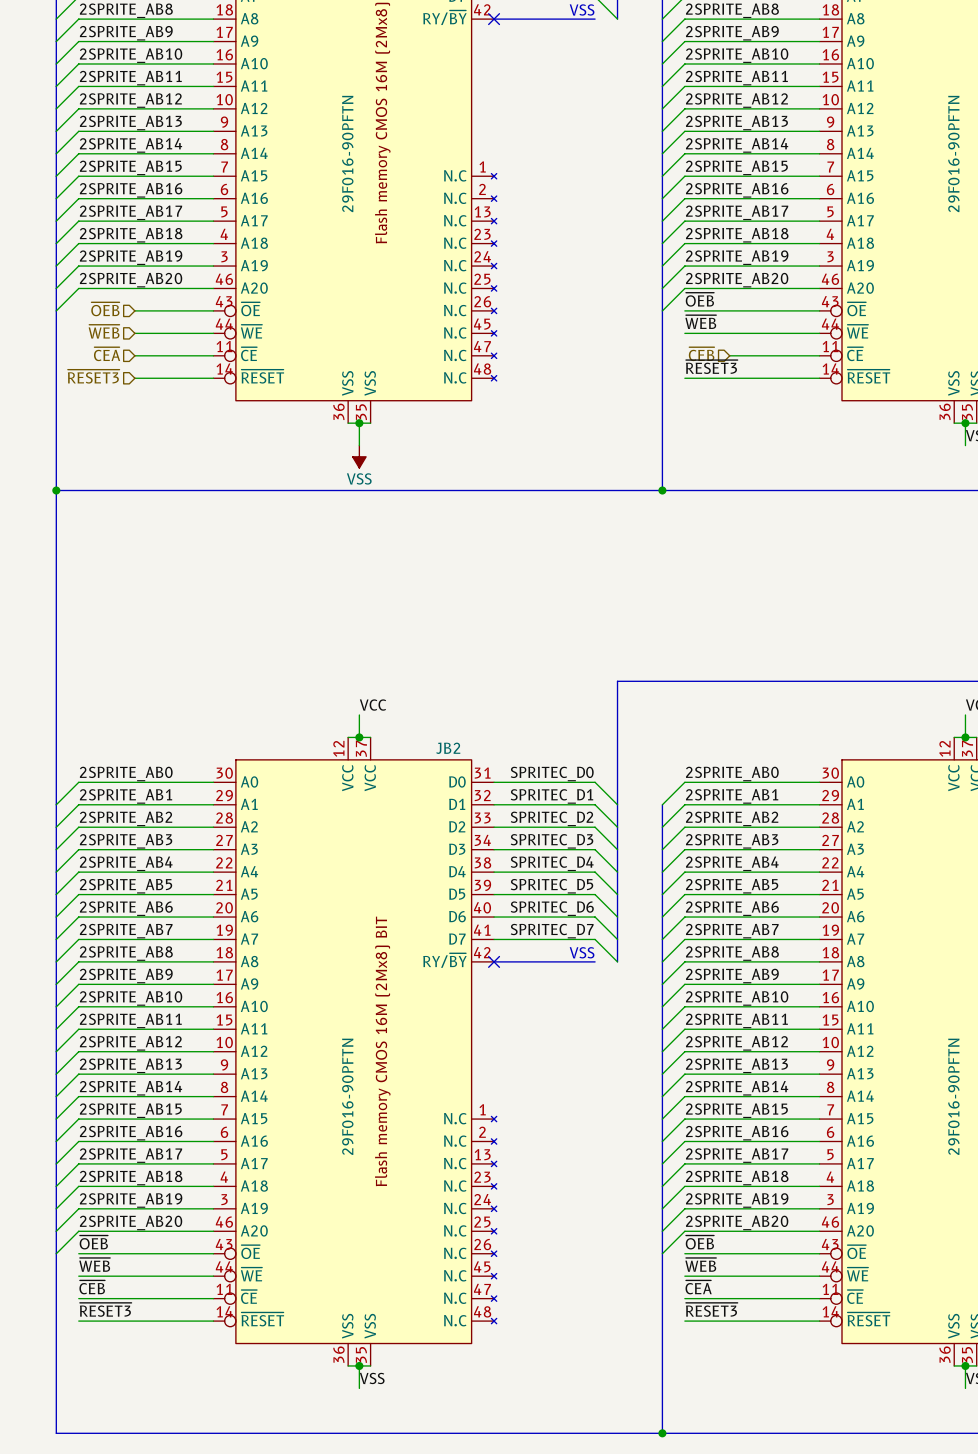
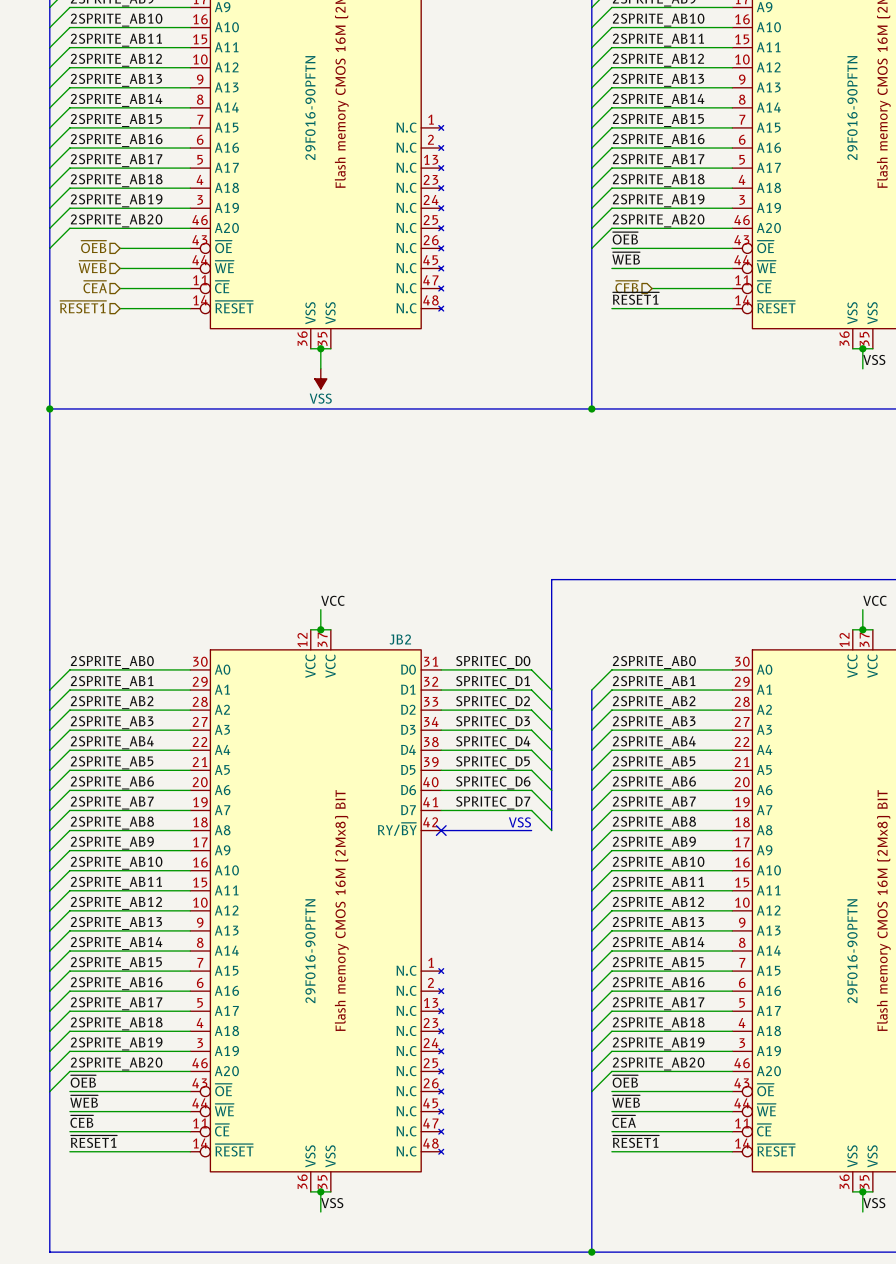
label: ~{RESET3} (711, 367) -> ~{RESET1} (635, 298)
hierarchical label: ~{RESET3} (93, 376) -> ~{RESET1} (83, 307)
label: ~{RESET3} (105, 1309) -> ~{RESET1} (93, 1141)
label: ~{RESET3} (711, 1309) -> ~{RESET1} (635, 1141)

